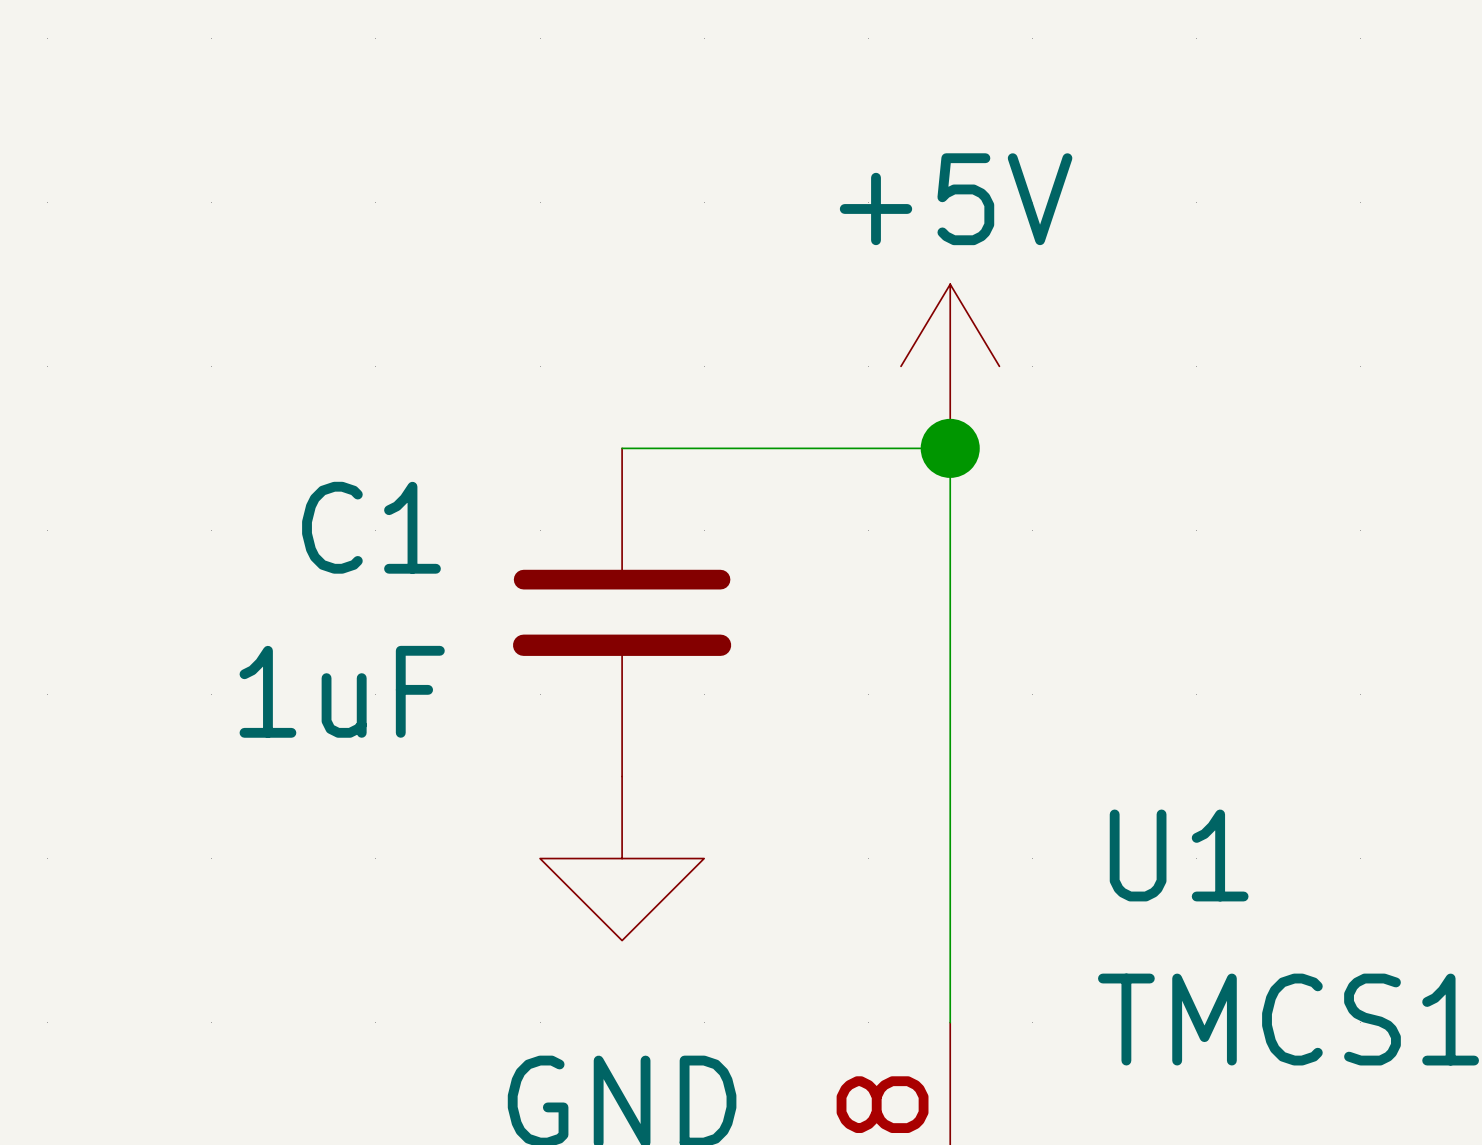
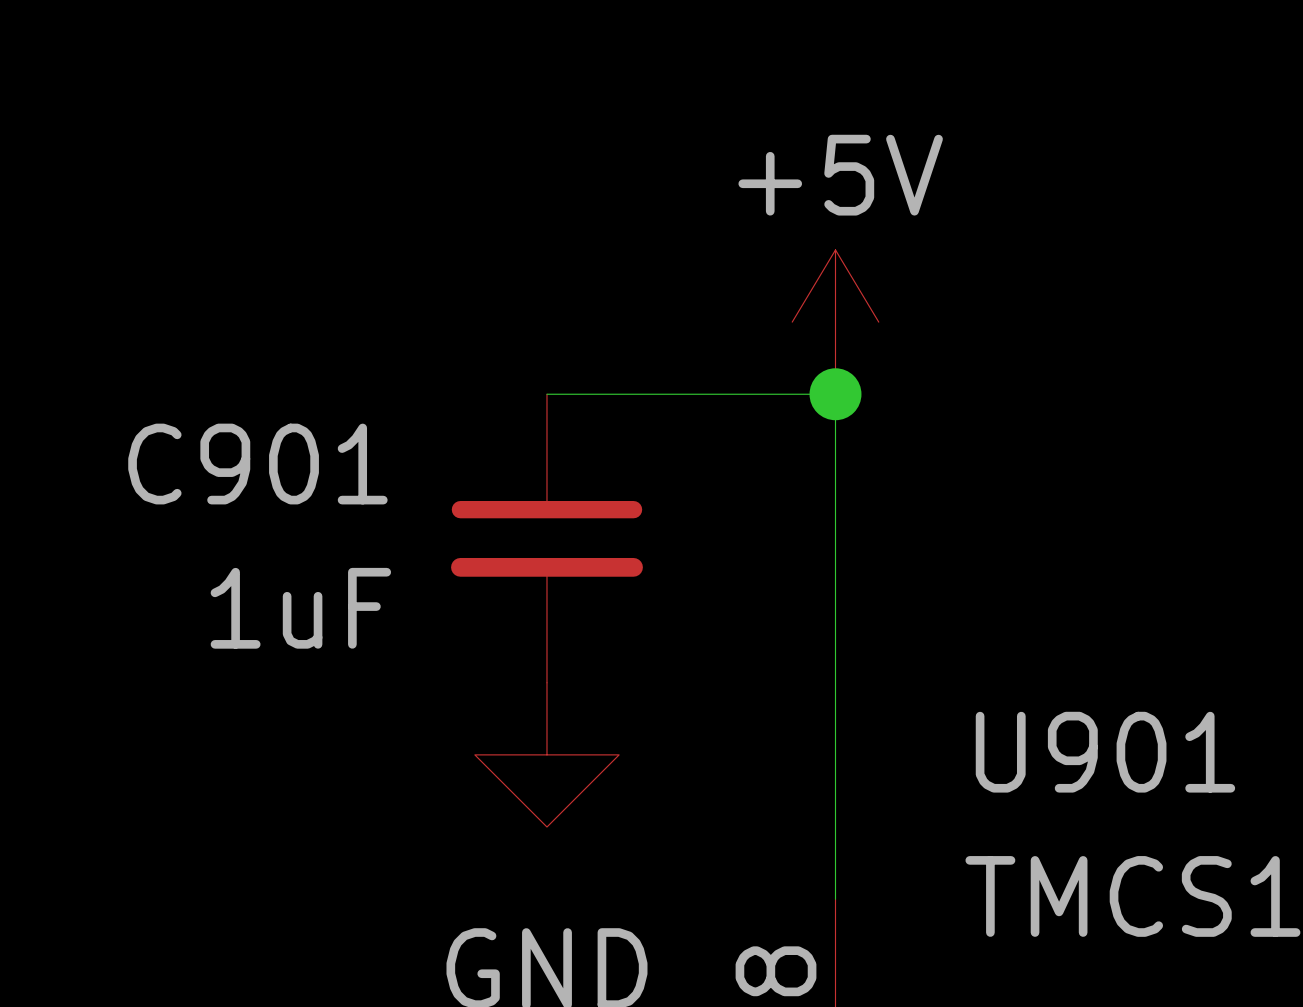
C1 name: C1 (371, 527) -> C901 (257, 464)
U1 name: U1 (1179, 855) -> U901 (1105, 752)

